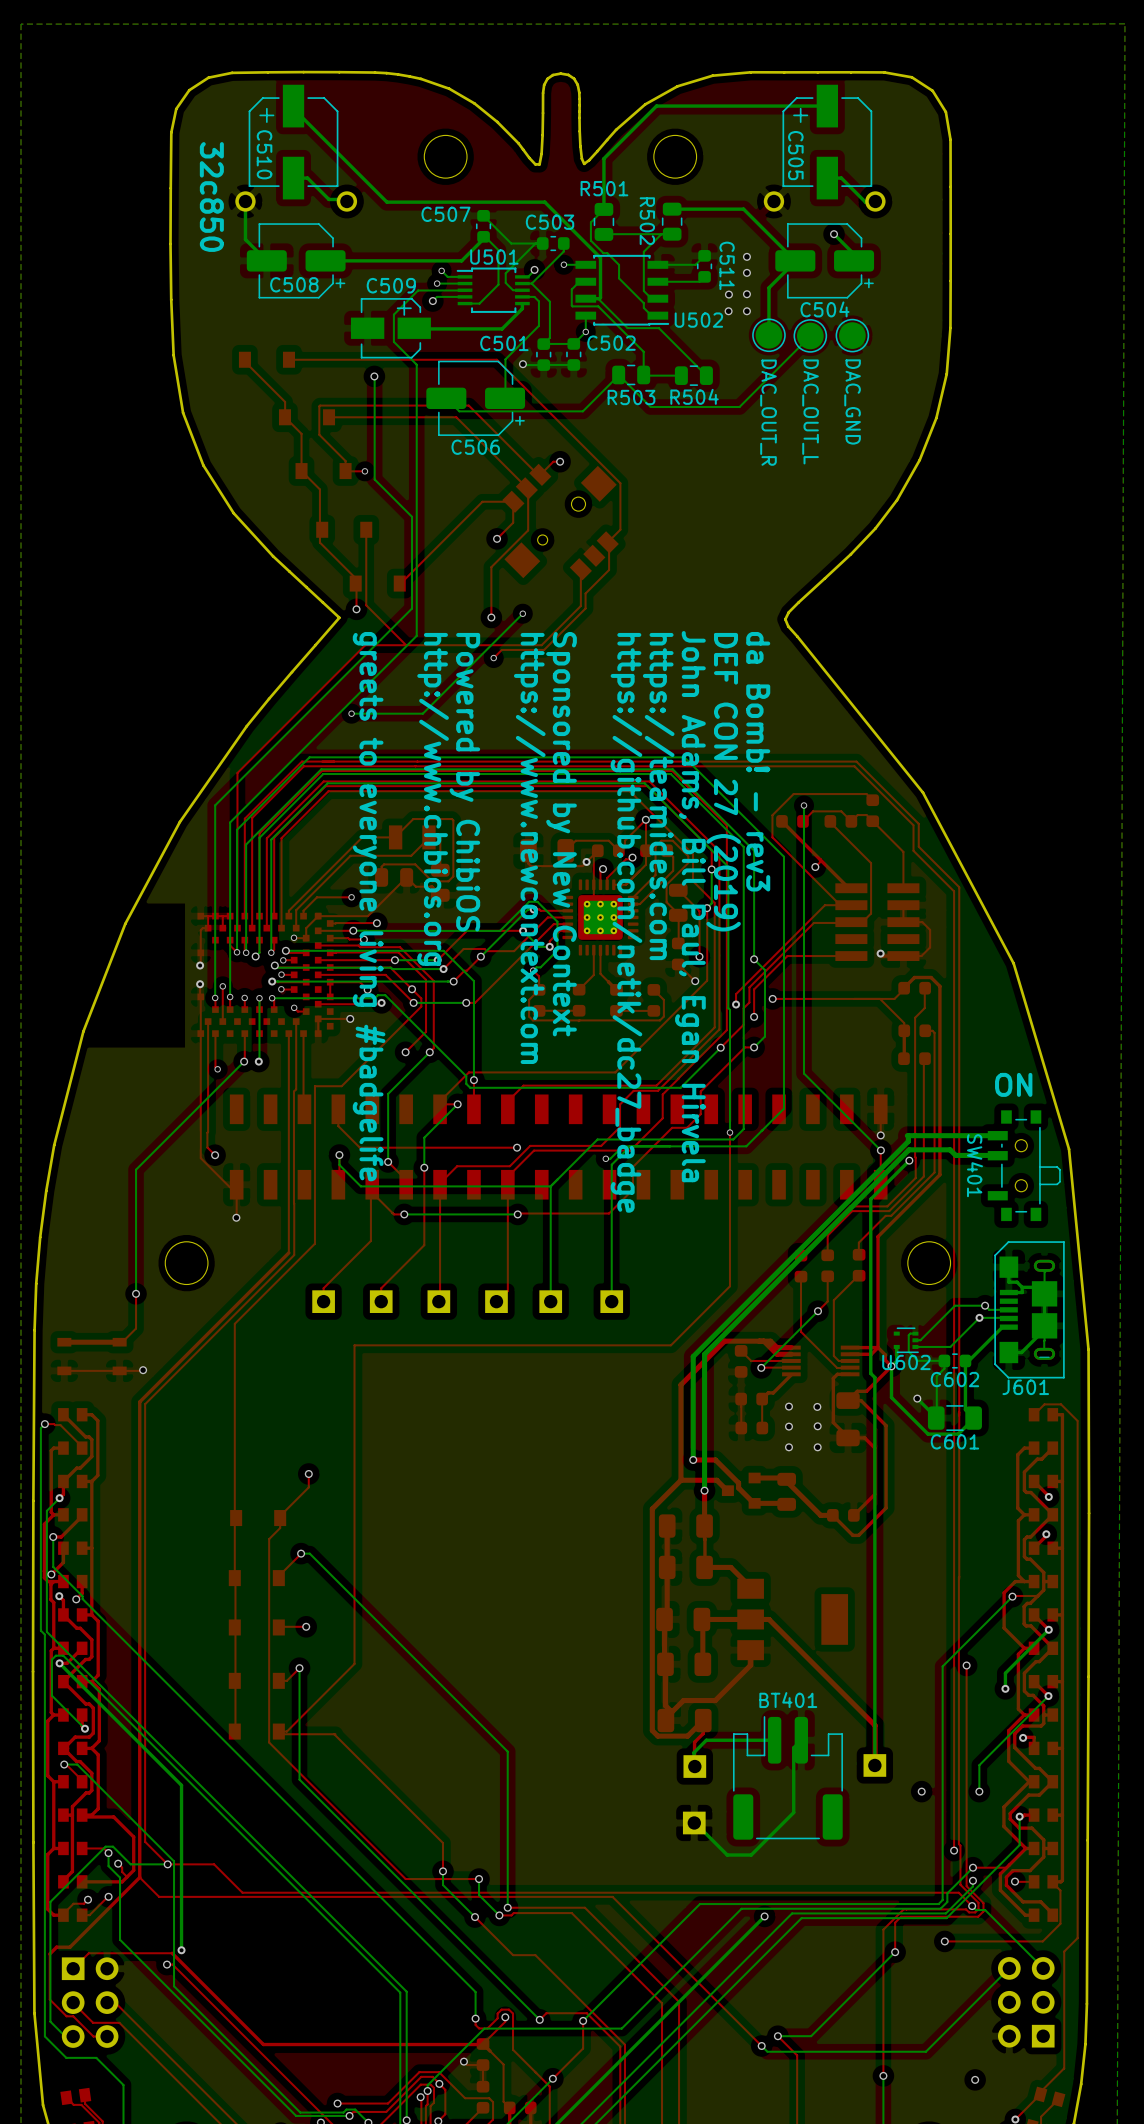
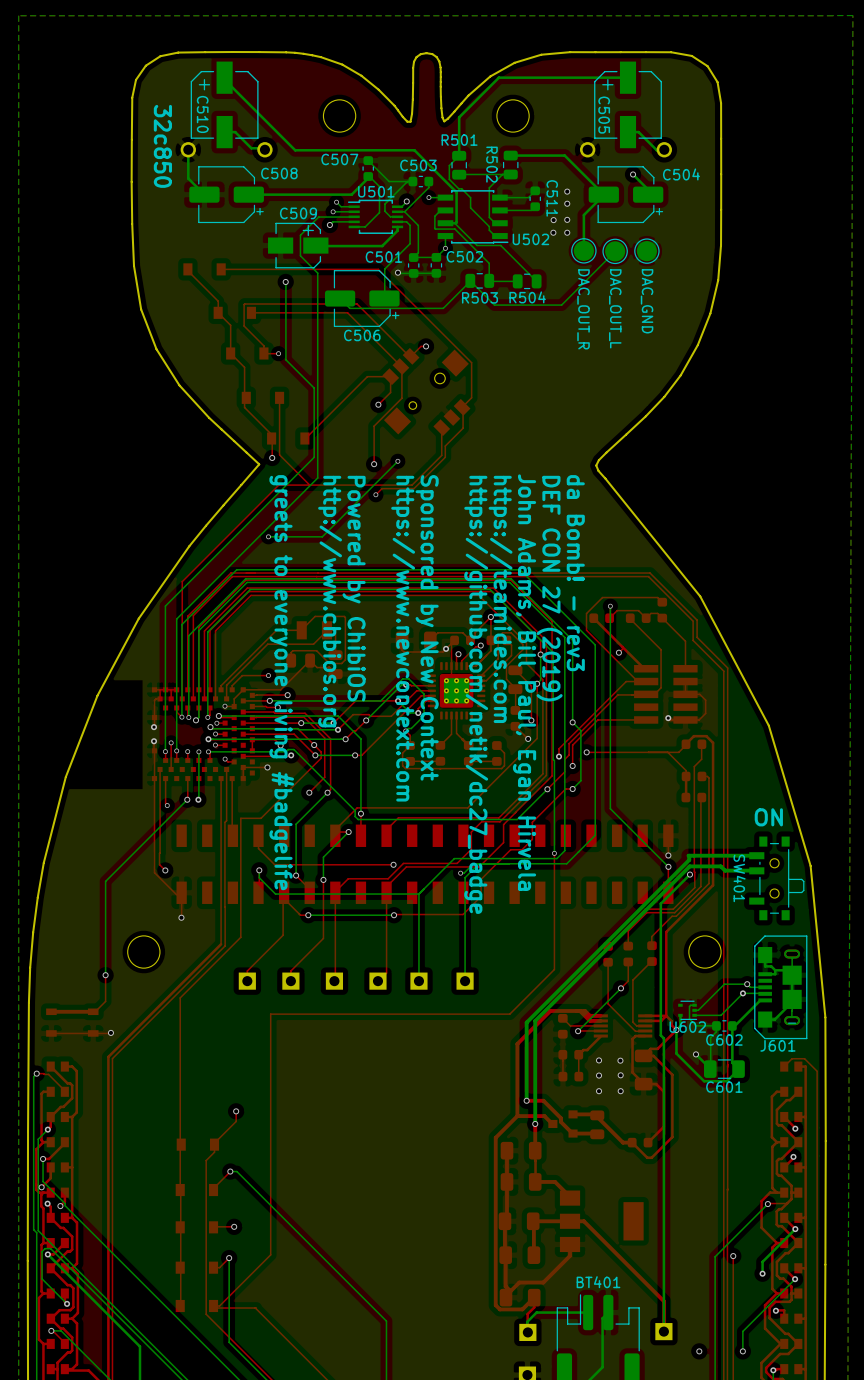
C508 name position: C508 (294, 284) -> C508 (279, 173)
C504 name position: C504 (825, 309) -> C504 (681, 174)

